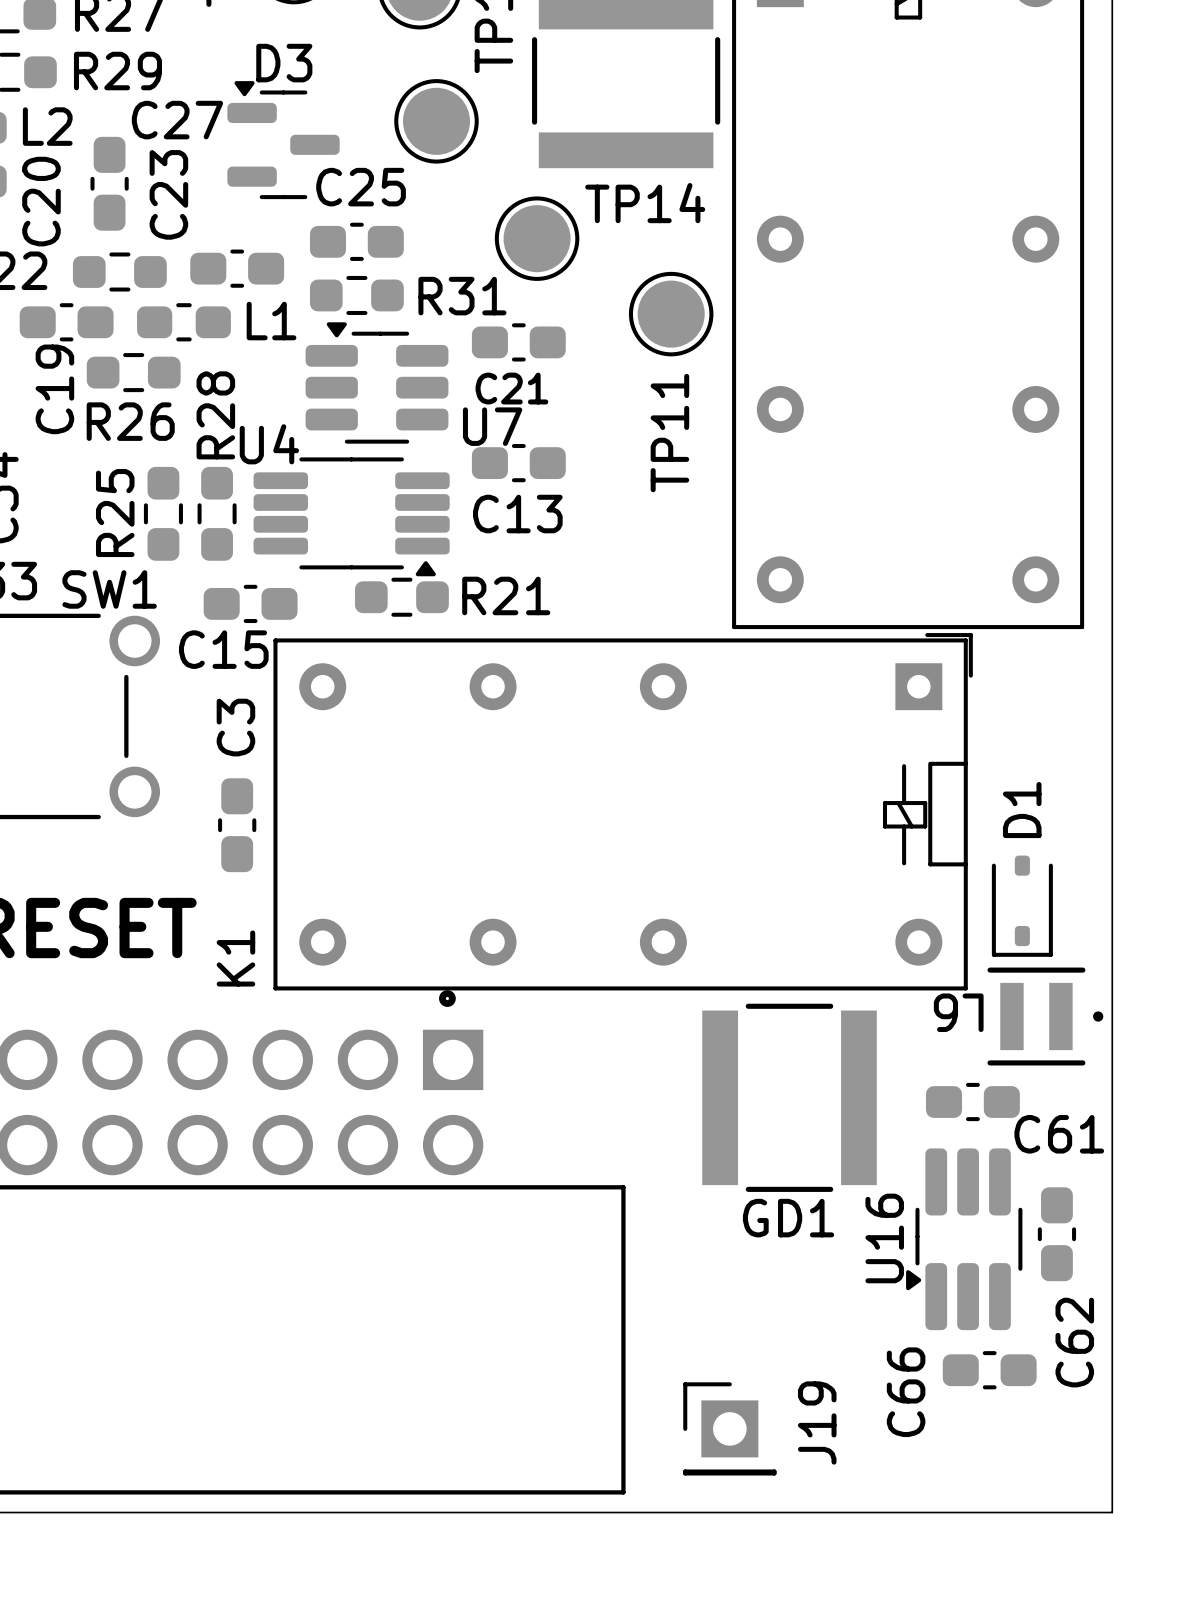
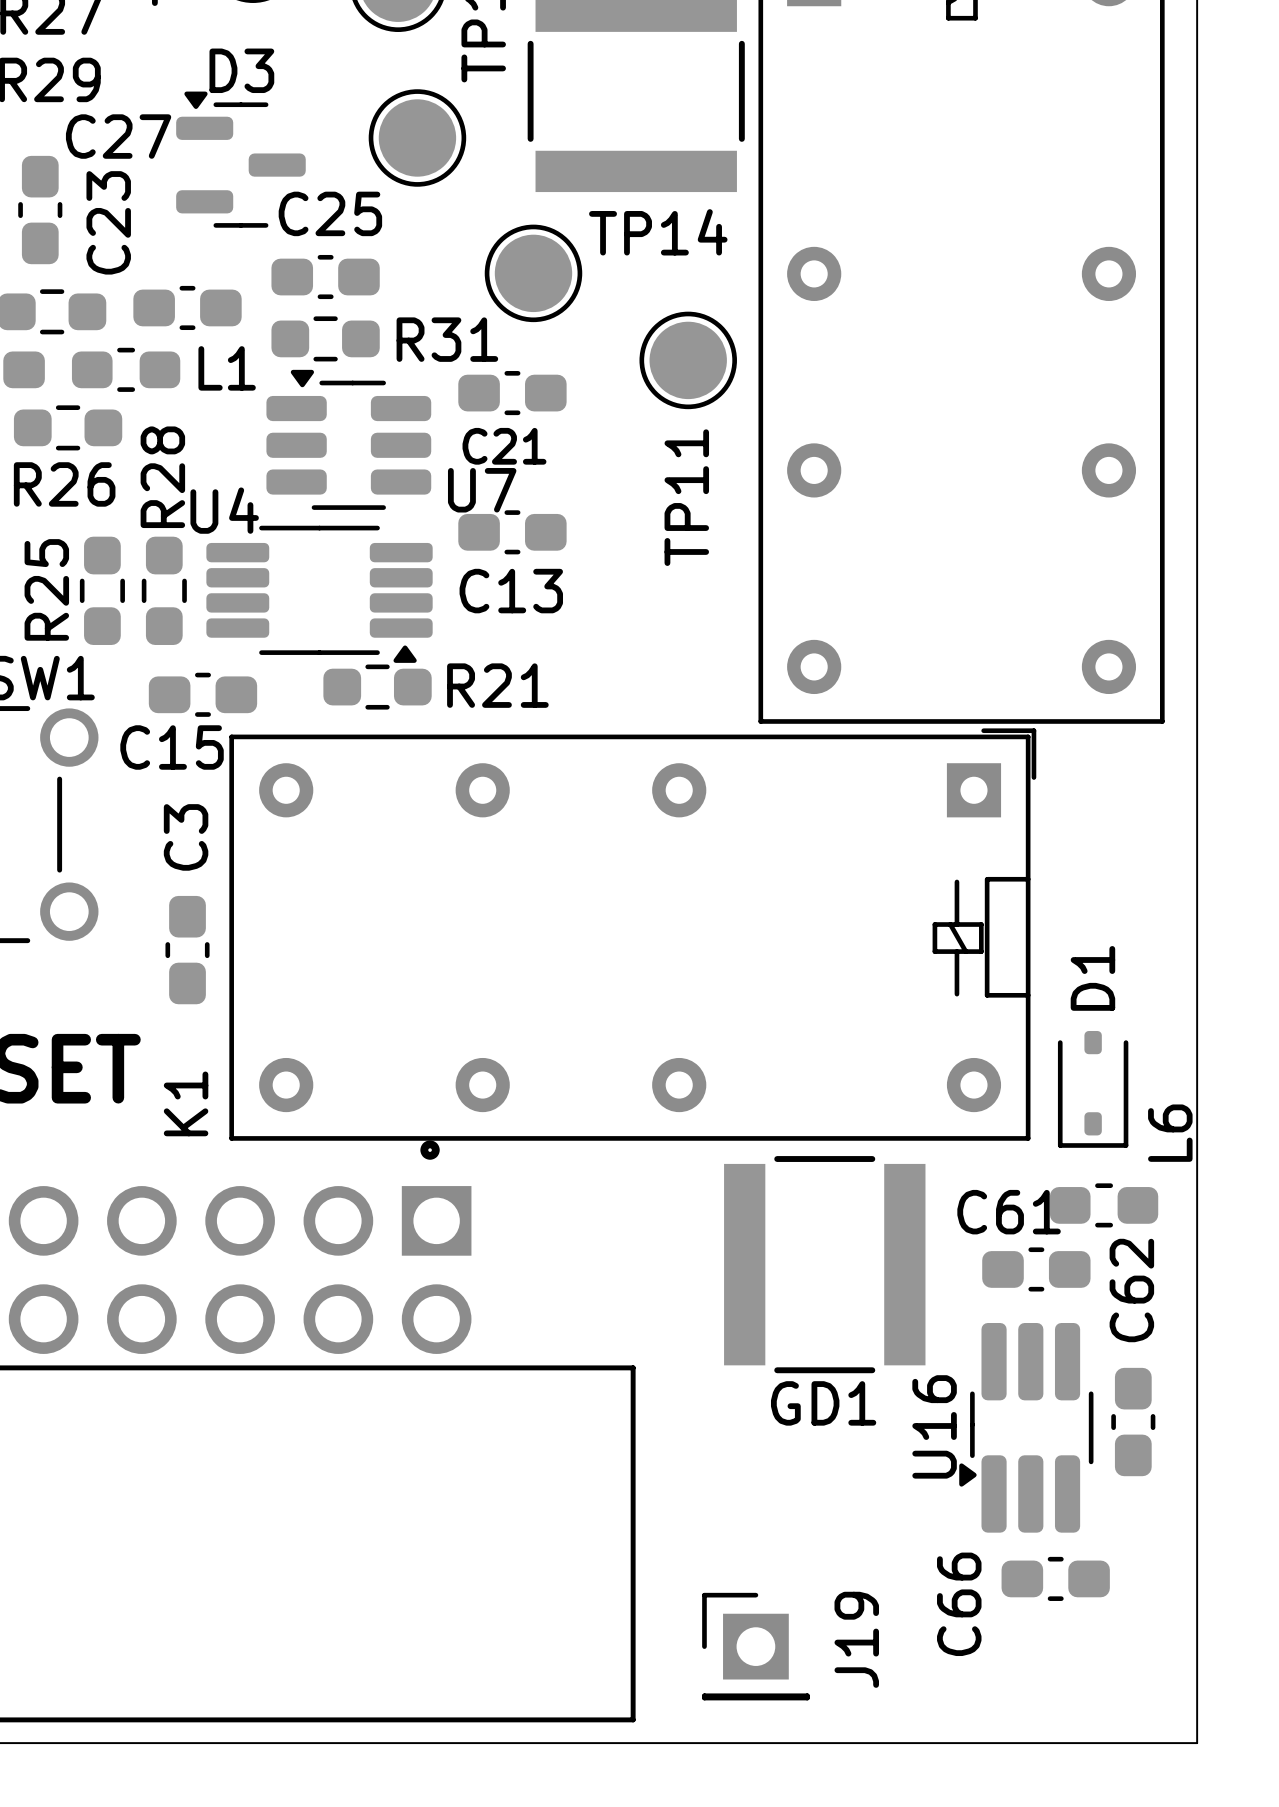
D1 position: (1022, 906) -> (1093, 1089)
L6 footprint: [987, 967, 1104, 1066] -> [1049, 1183, 1159, 1228]
L6 name position: L6 (958, 1012) -> L6 (1170, 1133)
C61 name position: C61 (1059, 1134) -> C61 (1009, 1212)
C62 name position: C62 (1074, 1342) -> C62 (1131, 1290)

